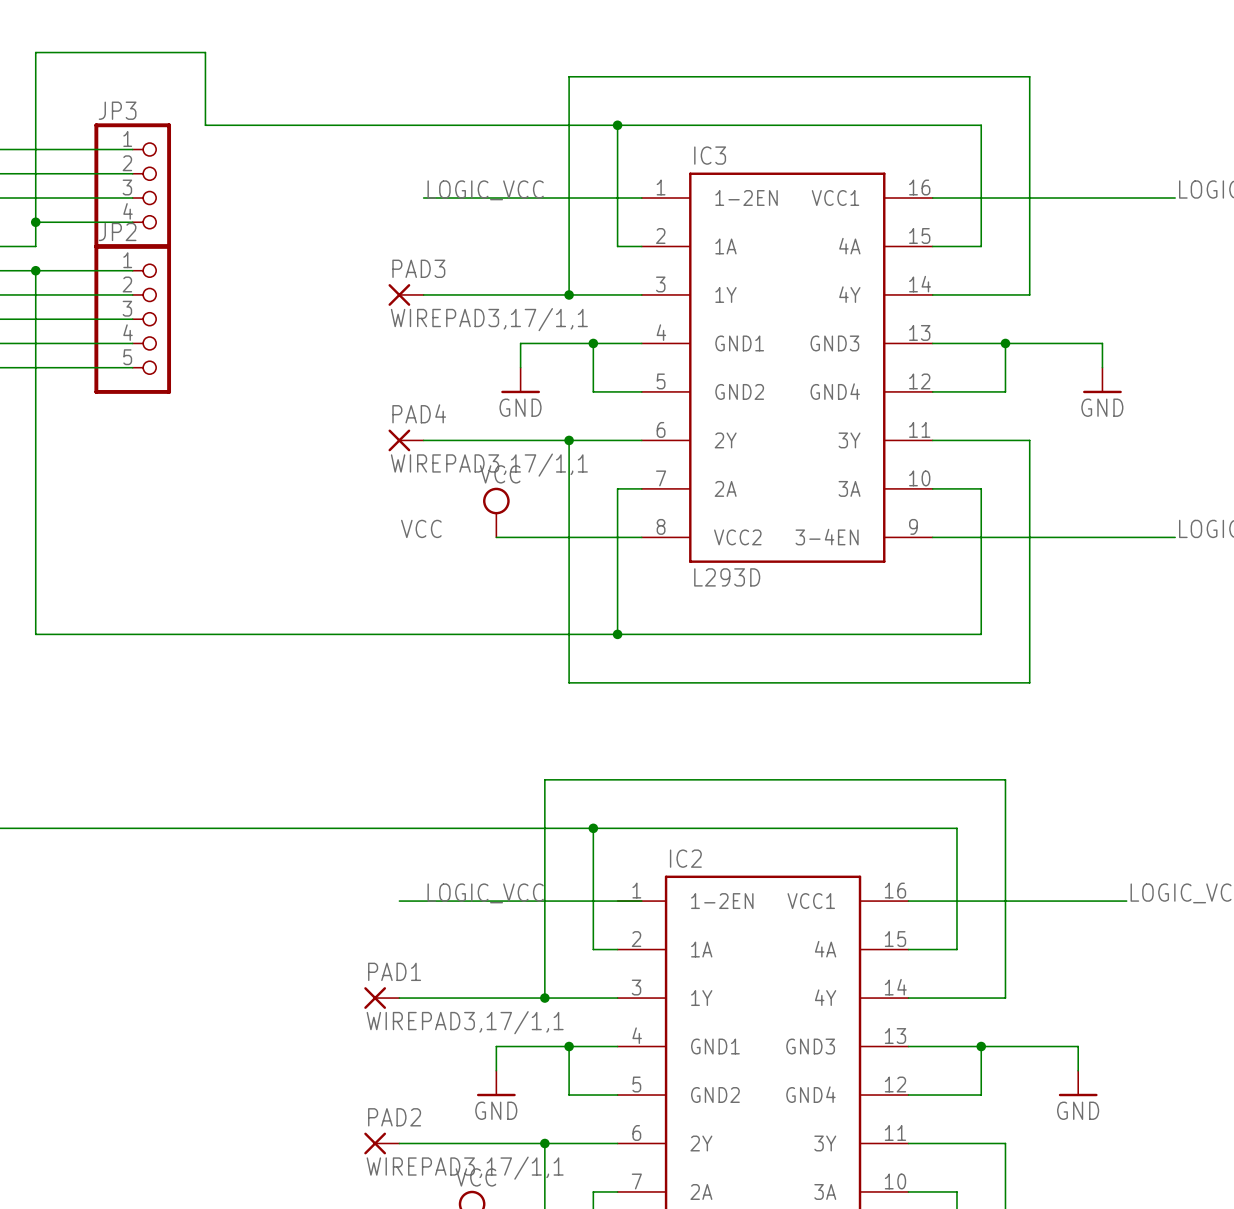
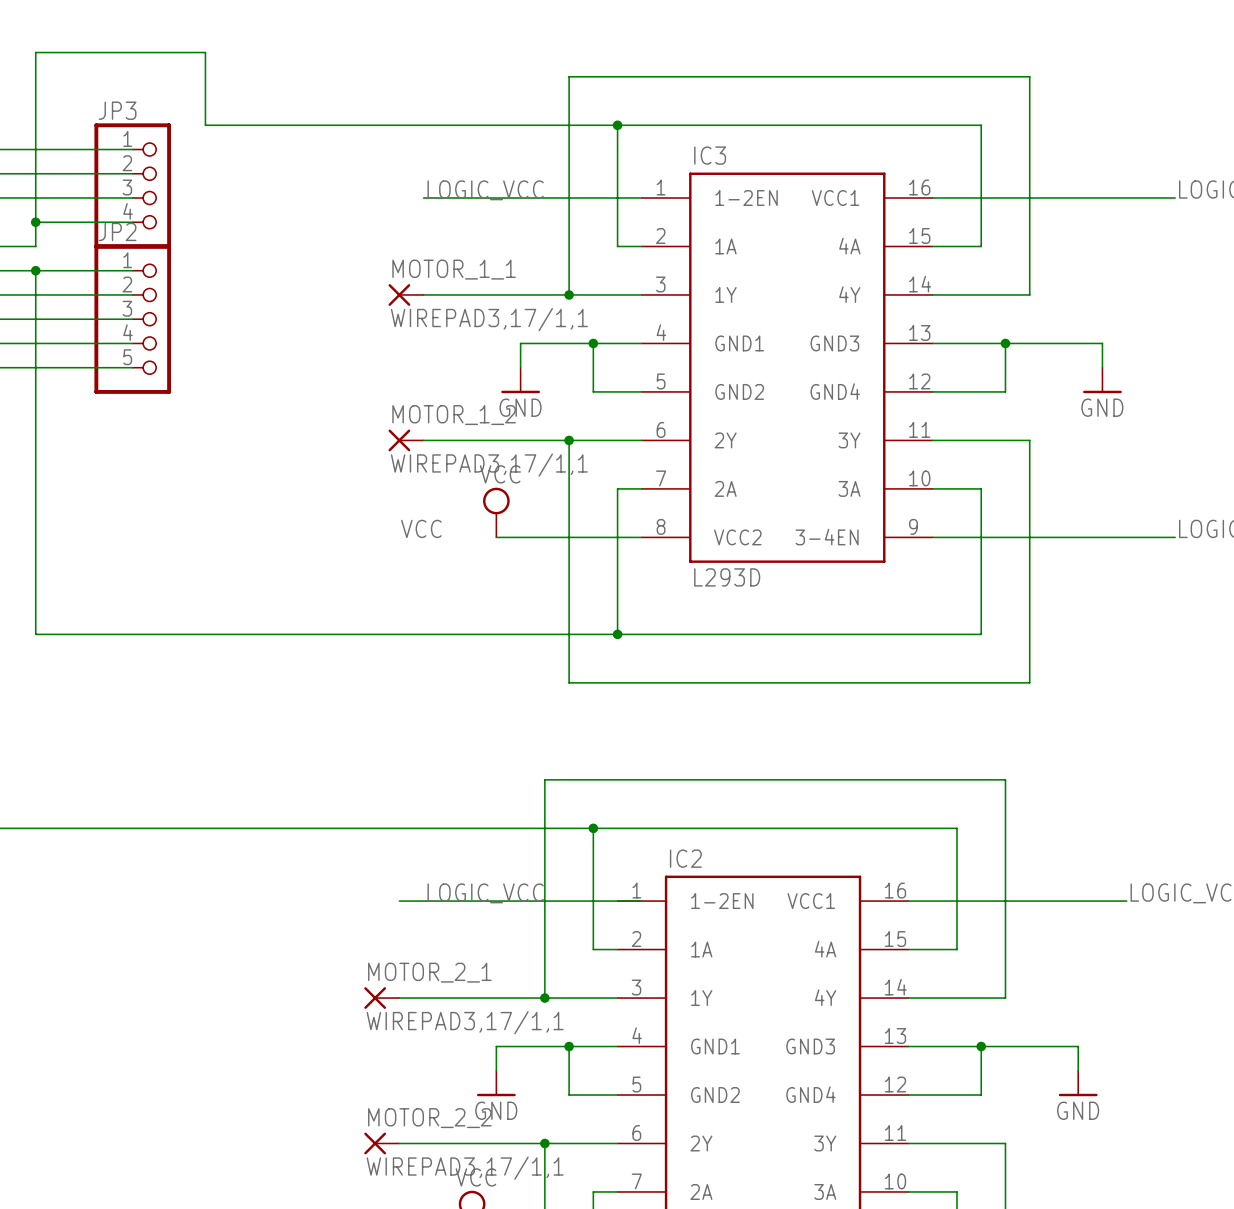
PAD3 name: PAD3 (418, 268) -> MOTOR_1_1 (454, 269)
PAD4 name: PAD4 (419, 413) -> MOTOR_1_2 (454, 415)
PAD1 name: PAD1 (394, 971) -> MOTOR_2_1 (429, 972)
PAD2 name: PAD2 (394, 1117) -> MOTOR_2_2 (429, 1118)

